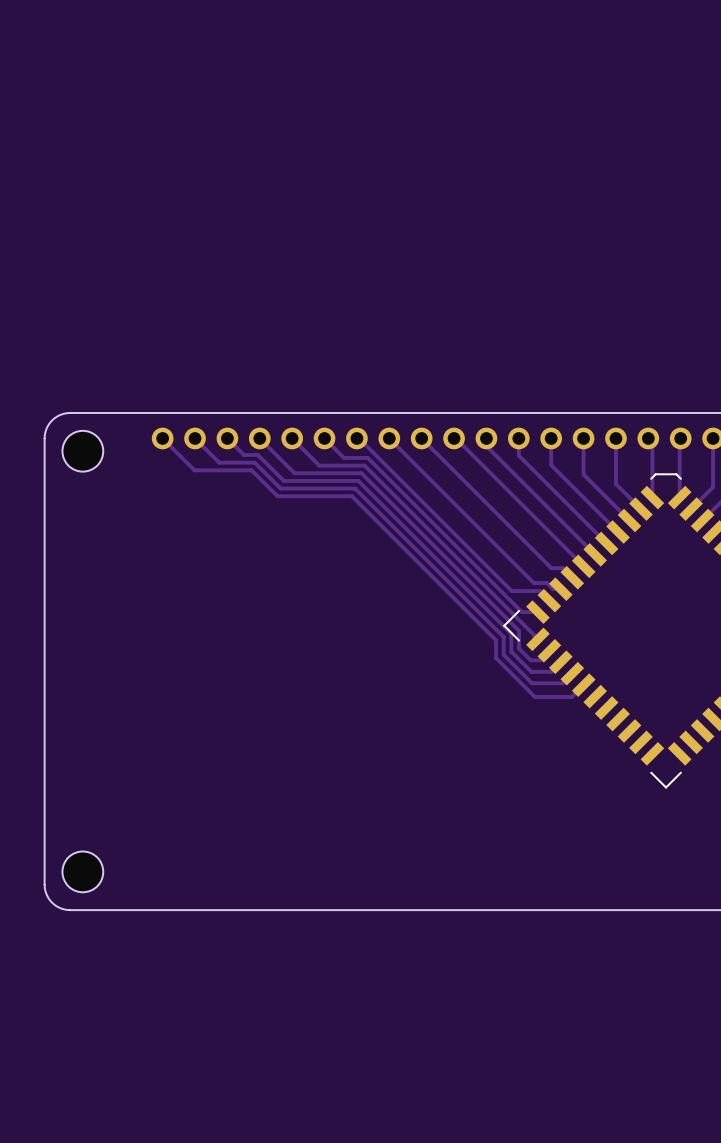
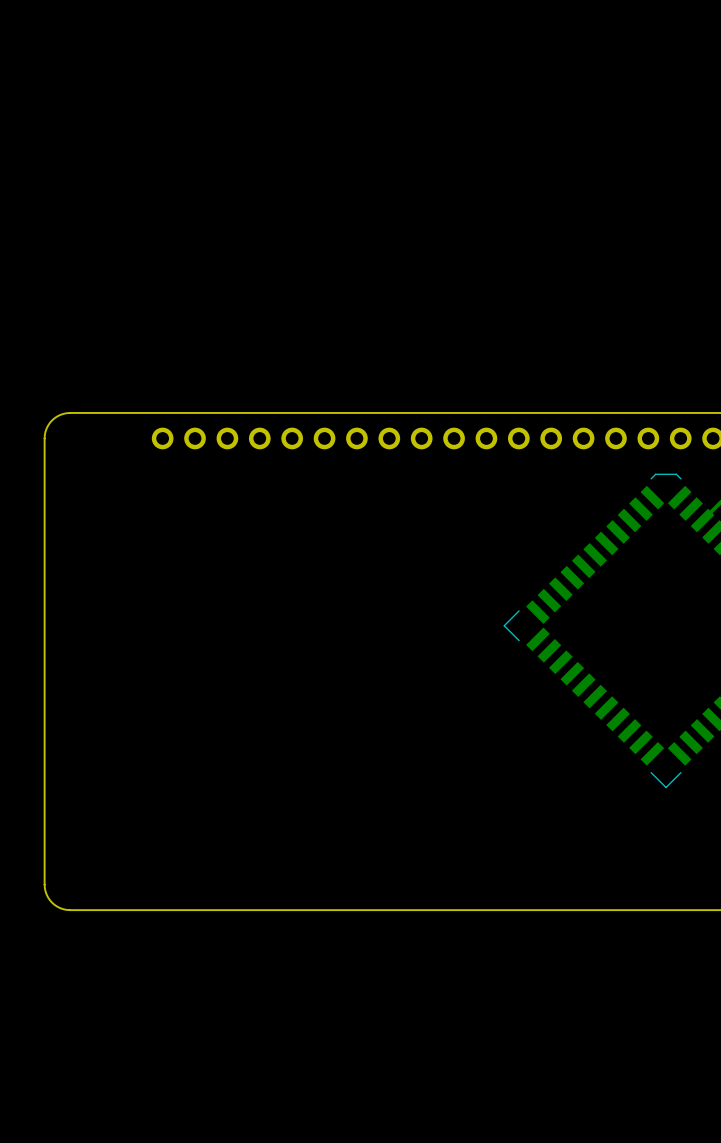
track: (162, 438) (194, 470) (251, 470) (277, 496) (351, 496) (496, 640) (496, 658) (534, 696) (571, 696) (583, 685) -> none
track: (195, 438) (219, 462) (254, 462) (280, 488) (355, 488) (503, 637) (503, 654) (532, 683) (562, 683) (572, 673) -> none
track: (227, 438) (243, 455) (257, 455) (283, 480) (358, 480) (511, 633) (511, 651) (531, 671) (551, 671) (560, 662) -> none
track: (259, 438) (294, 473) (361, 473) (519, 630) (519, 648) (530, 660) (539, 660) (549, 650) -> none
track: (292, 438) (319, 465) (364, 465) (537, 639) -> none
track: (324, 438) (344, 457) (367, 457) (521, 612) (537, 612) -> none
track: (356, 438) (360, 439) (511, 591) (539, 591) (549, 600) -> none
track: (389, 438) (533, 583) (547, 583) (553, 589) (560, 589) -> none
track: (421, 438) (551, 568) (562, 568) (572, 577) -> none
track: (454, 438) (583, 566) -> none
track: (486, 438) (486, 446) (595, 554) -> none
track: (518, 438) (518, 455) (606, 543) -> none
track: (551, 438) (551, 465) (618, 531) -> none
track: (583, 438) (583, 474) (629, 520) -> none
track: (615, 438) (615, 484) (640, 509) -> none
track: (648, 438) (652, 442) (652, 497) -> none
track: (680, 438) (679, 497) -> none
track: (713, 438) (713, 487) (691, 509) -> none
part: (82, 451) -> none
part: (82, 871) -> none

